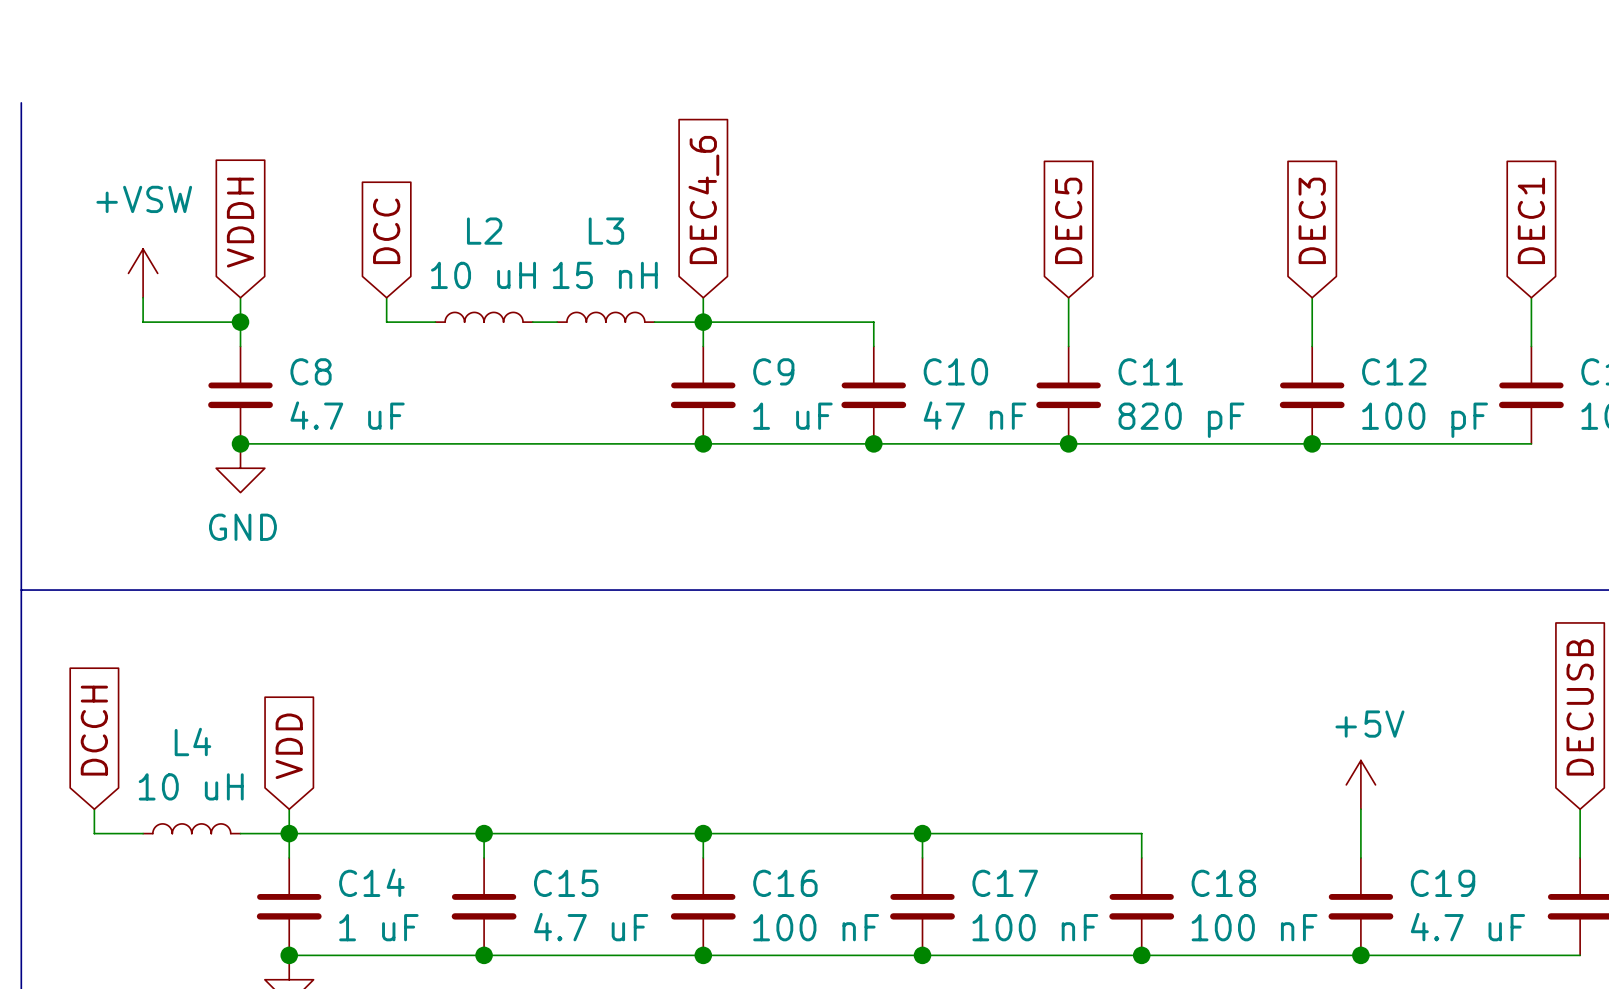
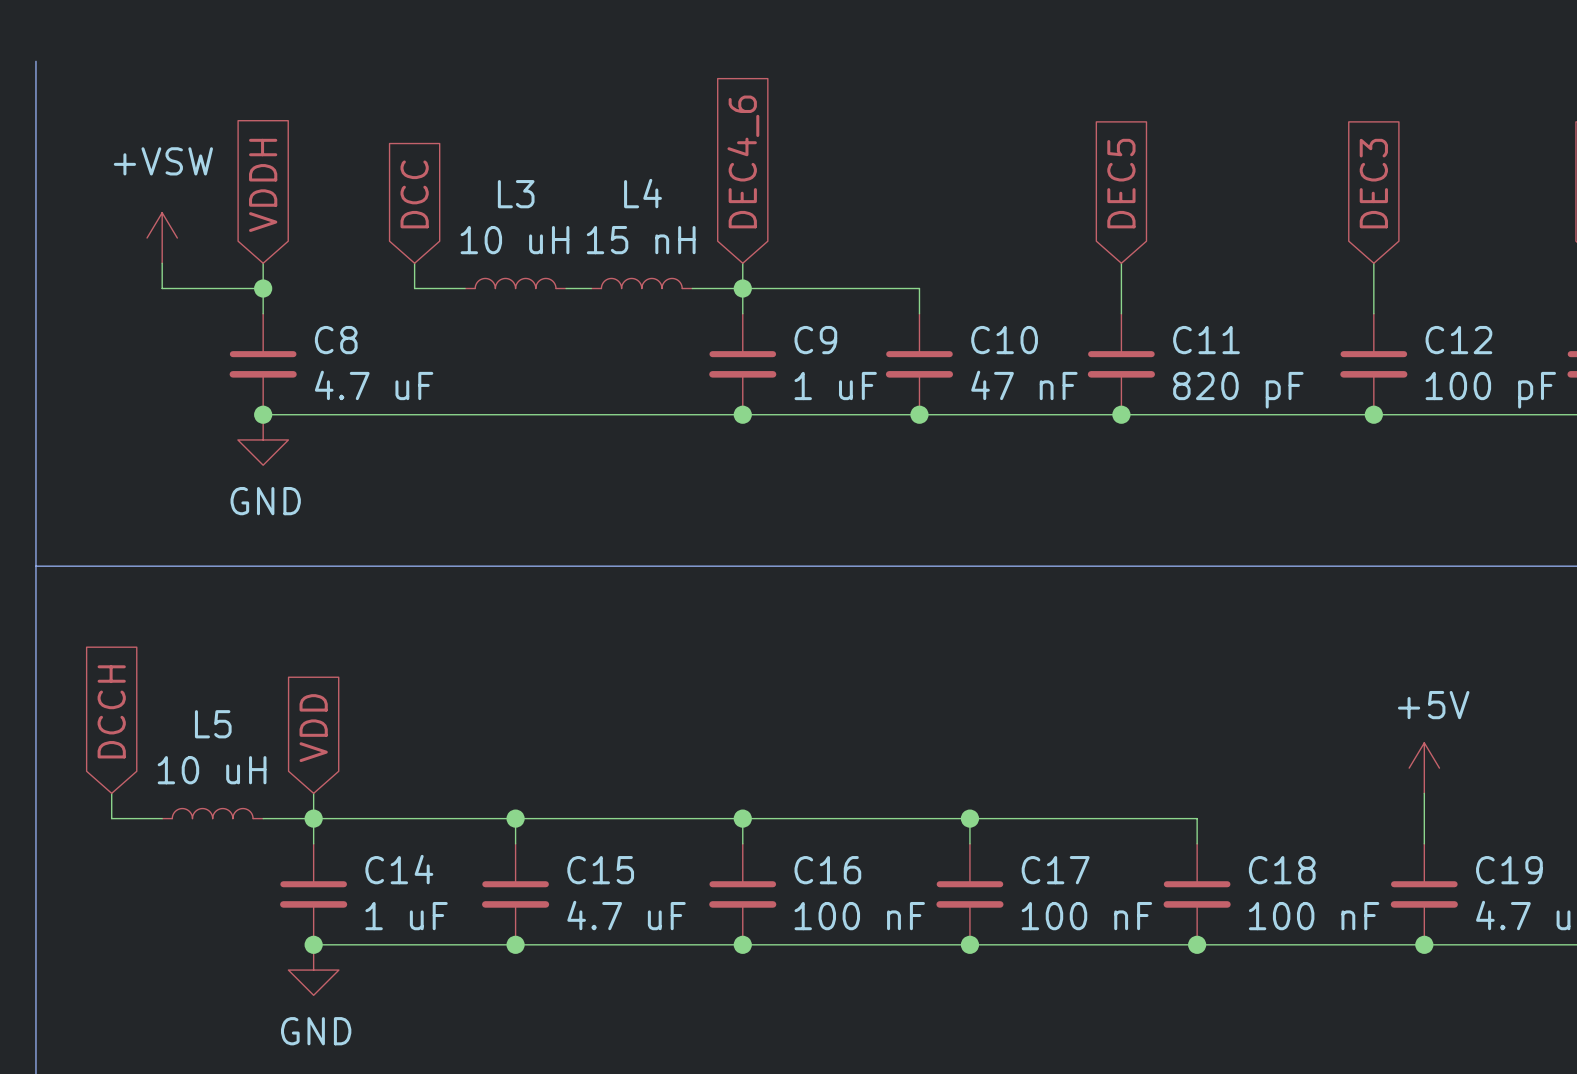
L2 name: L2 (484, 231) -> L3 (516, 194)
L3 name: L3 (606, 231) -> L4 (643, 193)
L4 name: L4 (192, 741) -> L5 (213, 724)

